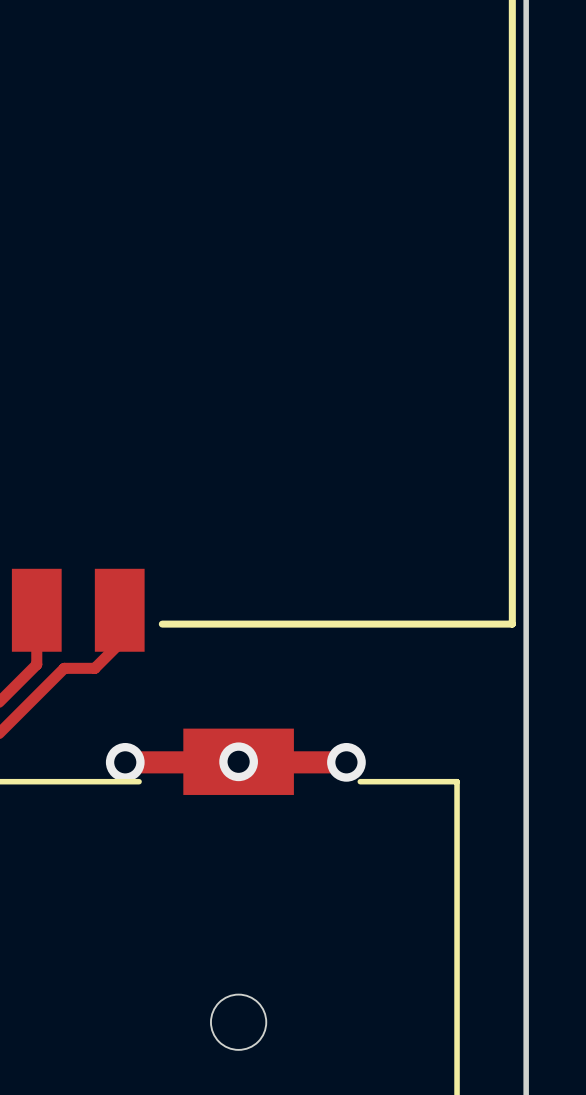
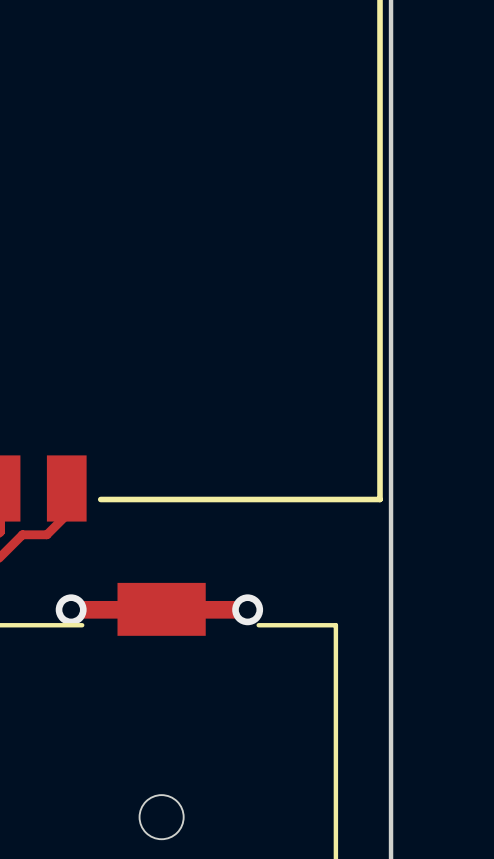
via: (238, 761) -> none

